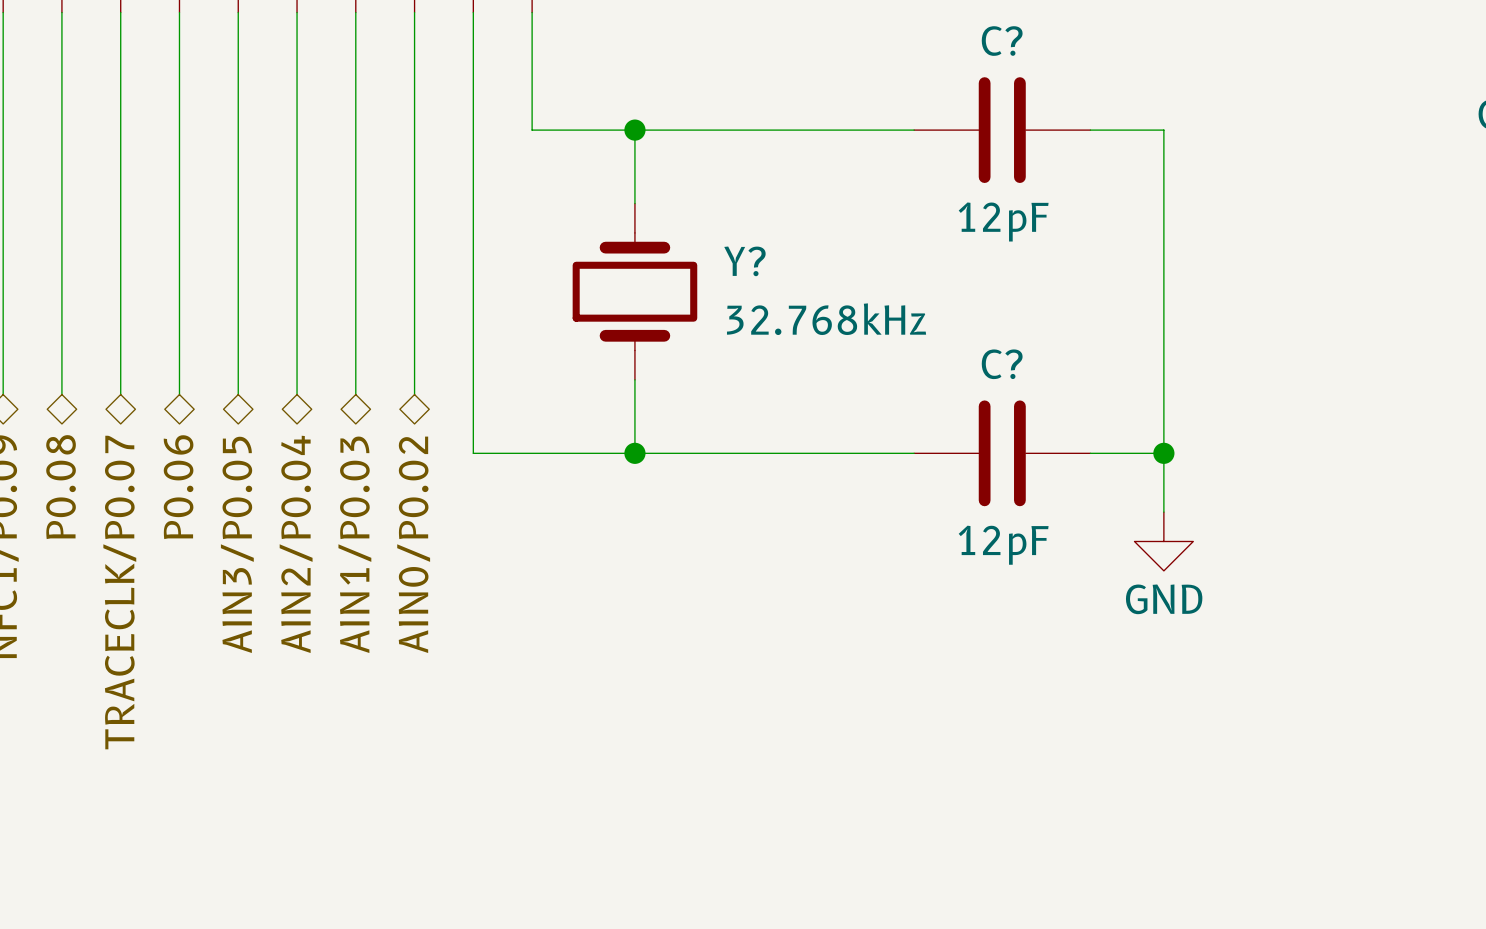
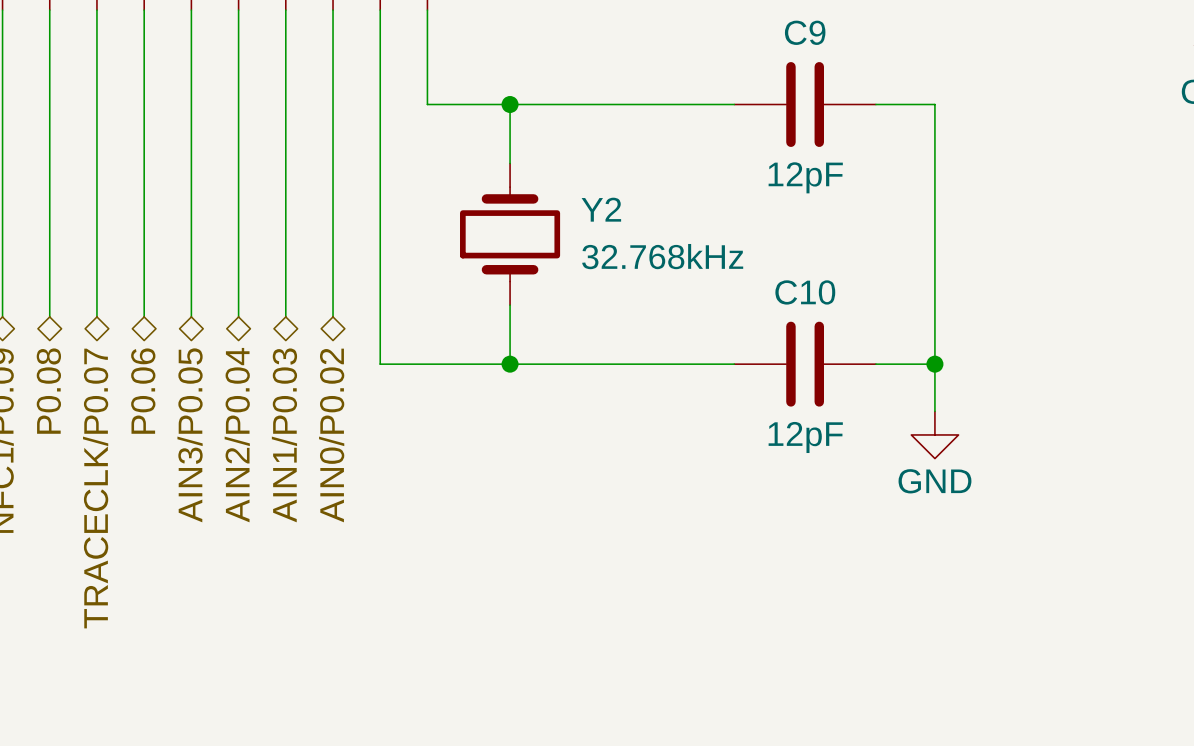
C? name: C? (1002, 41) -> C9 (805, 32)
Y? name: Y? (744, 261) -> Y2 (601, 209)
C? name: C? (1002, 364) -> C10 (805, 292)

